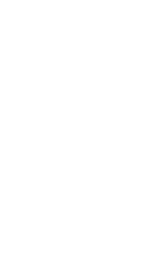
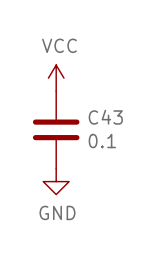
power symbol: none -> VCC (56, 78)
C43: none -> 0.1 (56, 129)
power symbol: none -> GND (56, 181)

